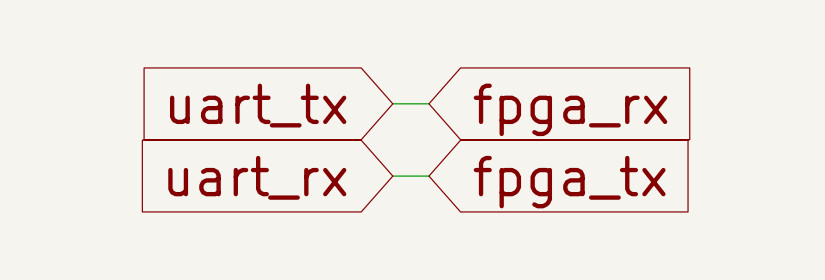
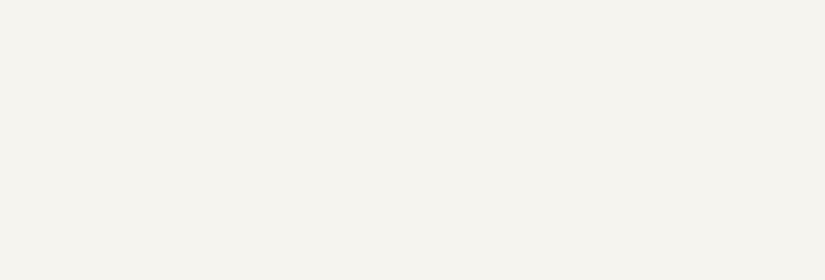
wire: (392, 103) (428, 103) -> none
global label: uart_tx (258, 105) -> none
global label: fpga_rx (570, 109) -> none
wire: (392, 176) (428, 176) -> none
global label: uart_rx (257, 177) -> none
global label: fpga_tx (569, 182) -> none

